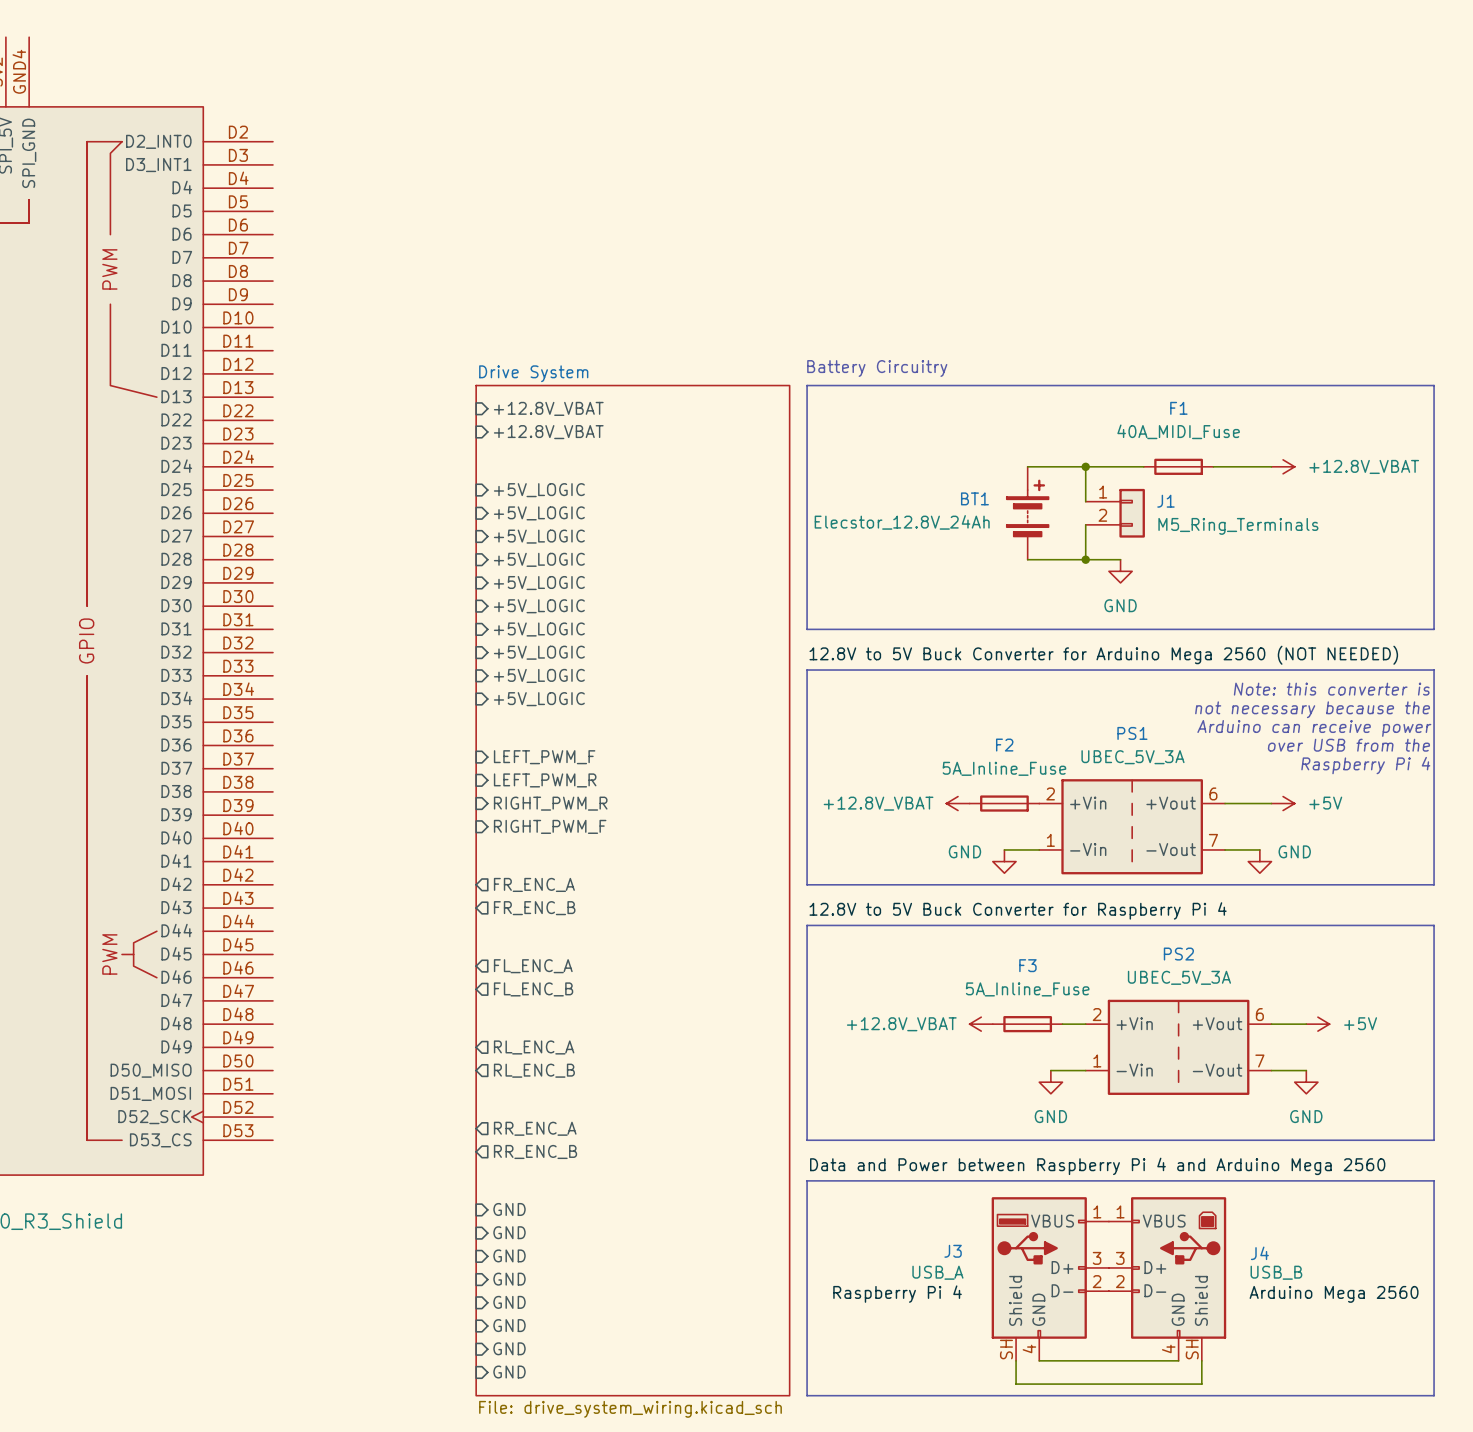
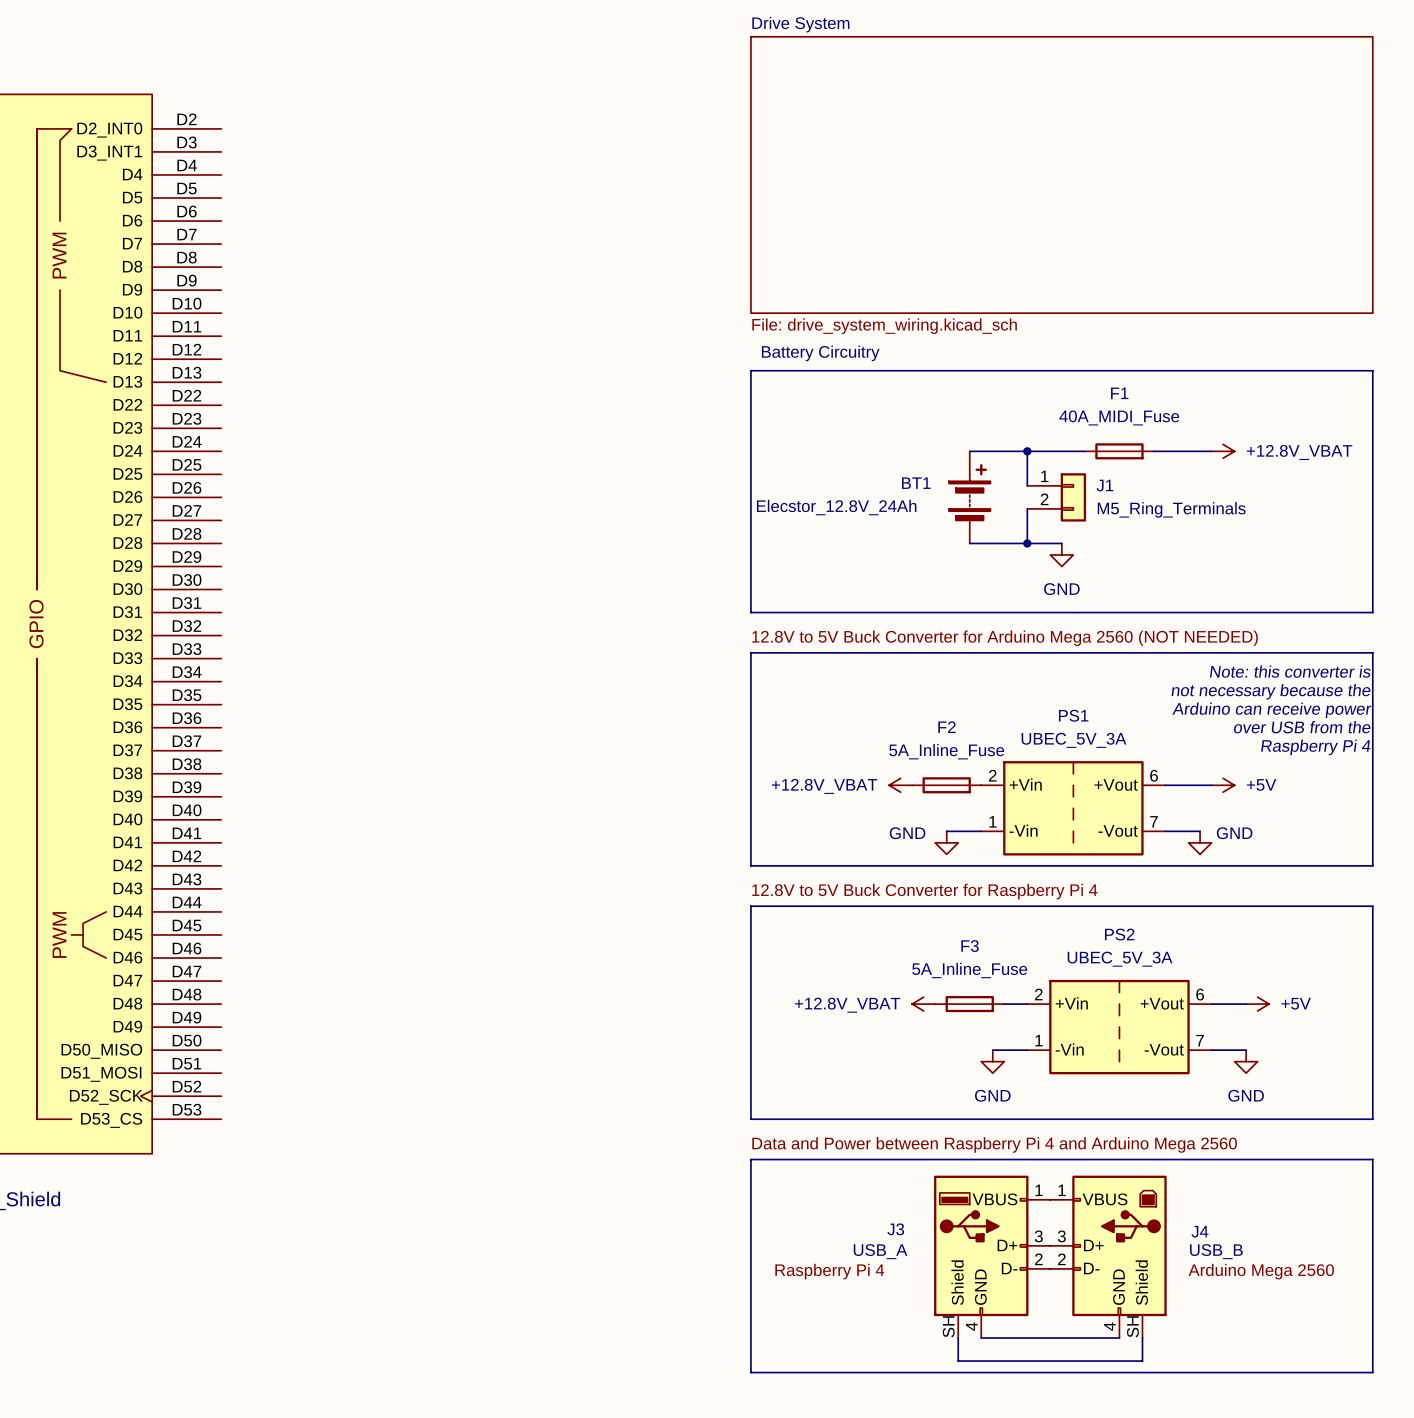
sheet Drive System: none -> File: drive_system_wiring.kicad_sch (1061, 174)
sheet pin: +12.8V_VBAT (548, 408) -> none
sheet pin: +12.8V_VBAT (548, 432) -> none
sheet pin: +5V_LOGIC (539, 490) -> none
sheet pin: +5V_LOGIC (539, 513) -> none
sheet pin: +5V_LOGIC (539, 536) -> none
sheet pin: +5V_LOGIC (539, 559) -> none
sheet pin: +5V_LOGIC (539, 583) -> none
sheet pin: +5V_LOGIC (539, 606) -> none
sheet pin: +5V_LOGIC (539, 629) -> none
sheet pin: +5V_LOGIC (539, 652) -> none
sheet pin: +5V_LOGIC (539, 675) -> none
sheet pin: +5V_LOGIC (539, 699) -> none
sheet pin: LEFT_PWM_F (544, 757) -> none
sheet pin: LEFT_PWM_R (545, 780) -> none
sheet pin: RIGHT_PWM_R (550, 803) -> none
sheet pin: RIGHT_PWM_F (550, 826) -> none
sheet pin: FR_ENC_A (534, 884) -> none
sheet Drive System: File: drive_system_wiring.kicad_sch (632, 890) -> none
sheet pin: FR_ENC_B (534, 908) -> none
sheet pin: FL_ENC_A (533, 966) -> none
sheet pin: FL_ENC_B (533, 989) -> none
sheet pin: RL_ENC_A (534, 1047) -> none
sheet pin: RL_ENC_B (534, 1070) -> none
sheet pin: RR_ENC_A (535, 1128) -> none
sheet pin: RR_ENC_B (535, 1151) -> none
sheet pin: GND (509, 1209) -> none
sheet pin: GND (509, 1232) -> none
sheet pin: GND (509, 1255) -> none
sheet pin: GND (509, 1279) -> none
sheet pin: GND (509, 1302) -> none
sheet pin: GND (509, 1325) -> none
sheet pin: GND (509, 1348) -> none
sheet pin: GND (509, 1372) -> none

